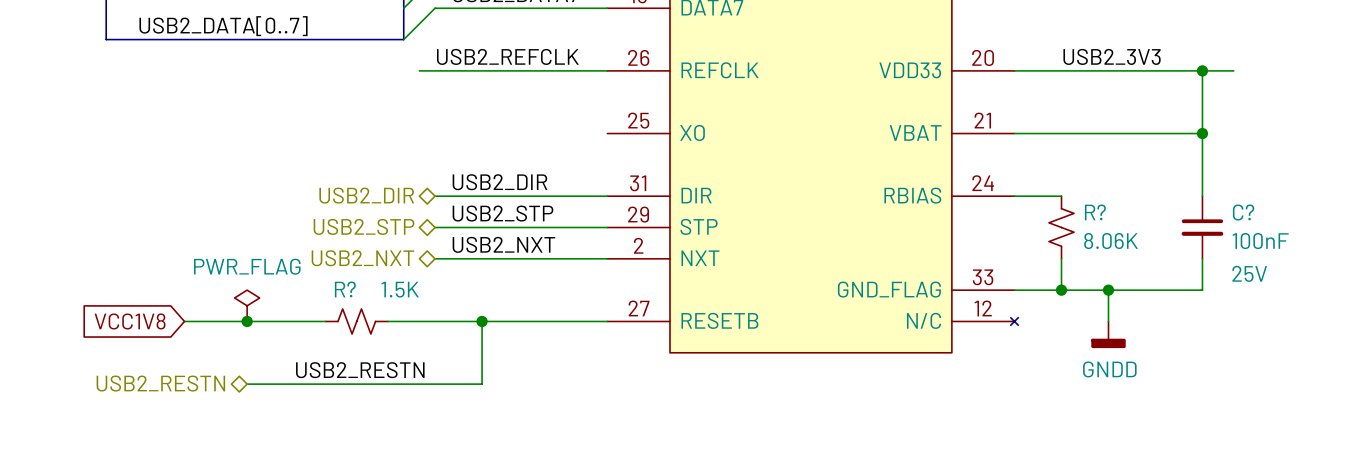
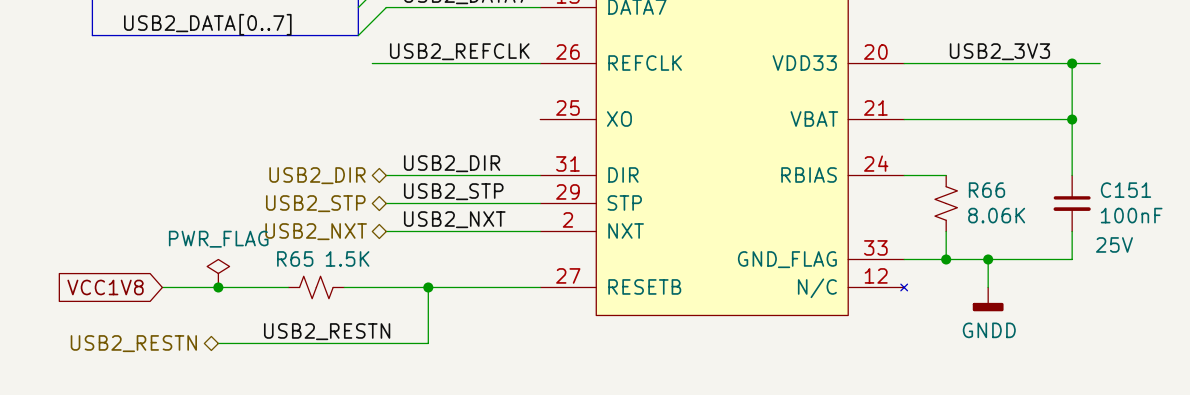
R? name: R? (1095, 212) -> R66 (986, 190)
C? name: C? (1243, 212) -> C151 (1126, 190)
R? name: R? (345, 289) -> R65 (295, 258)

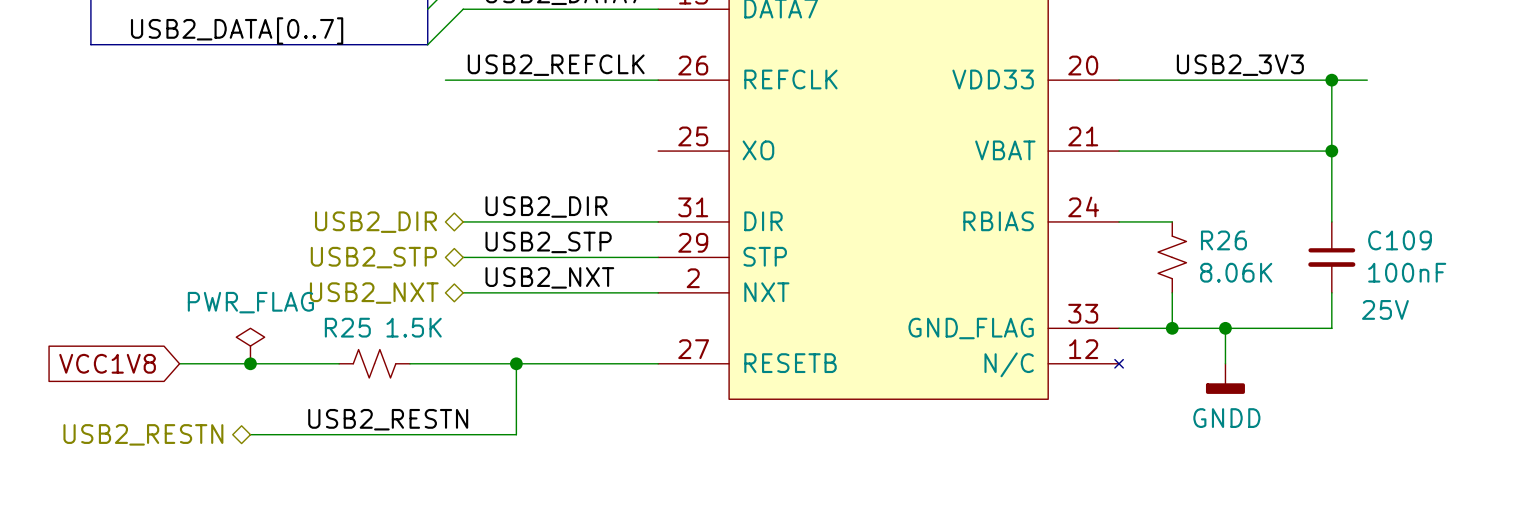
R66 name: R66 (986, 190) -> R26 (1223, 240)
C151 name: C151 (1126, 190) -> C109 (1400, 240)
R65 name: R65 (295, 258) -> R25 (347, 327)

